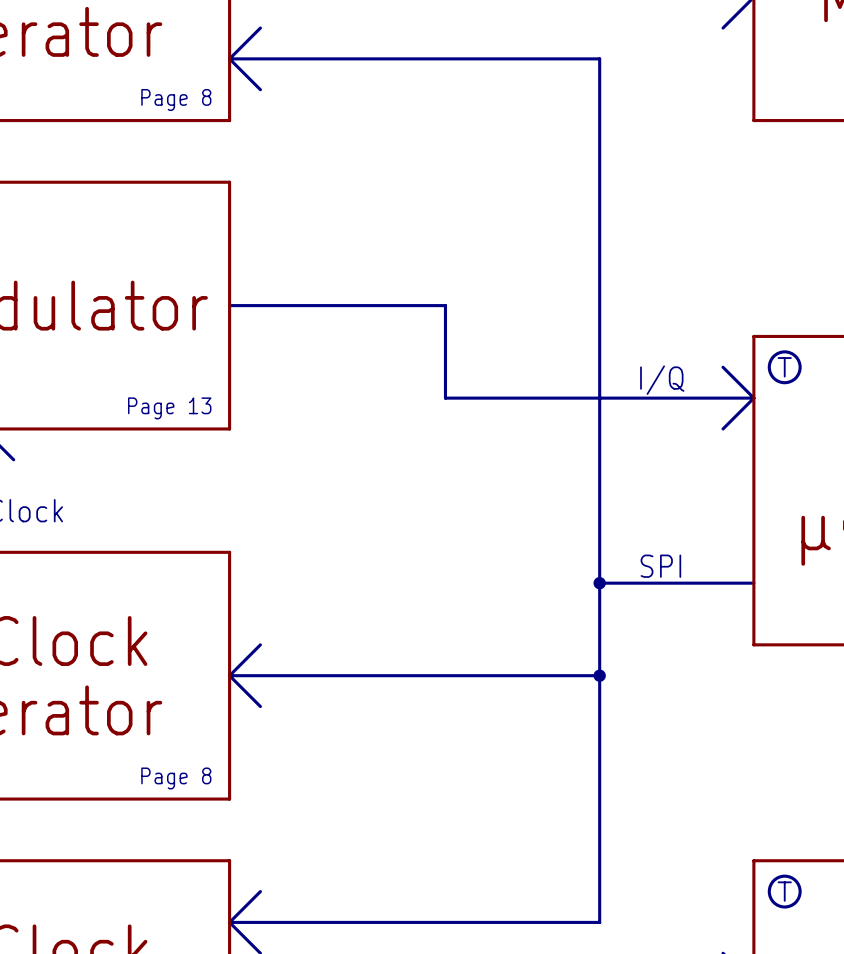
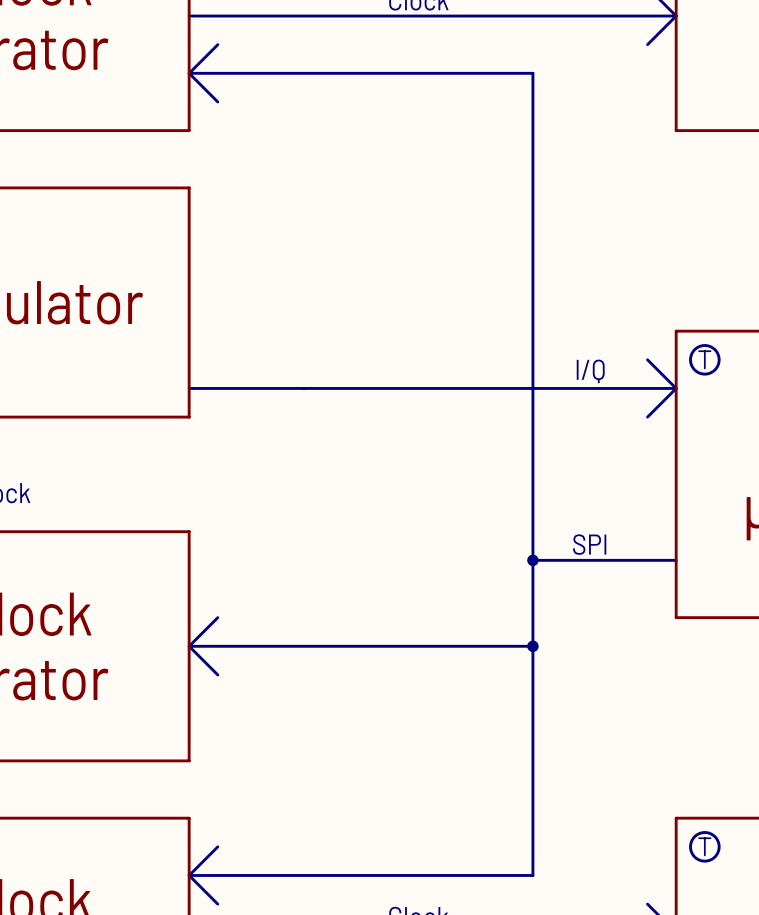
text: Page 8 (176, 99) -> none
line: (229, 305) (445, 305) (445, 398) -> (189, 388) (389, 388)
text: Page 13 (169, 408) -> none
text: Page 8 (176, 778) -> none

